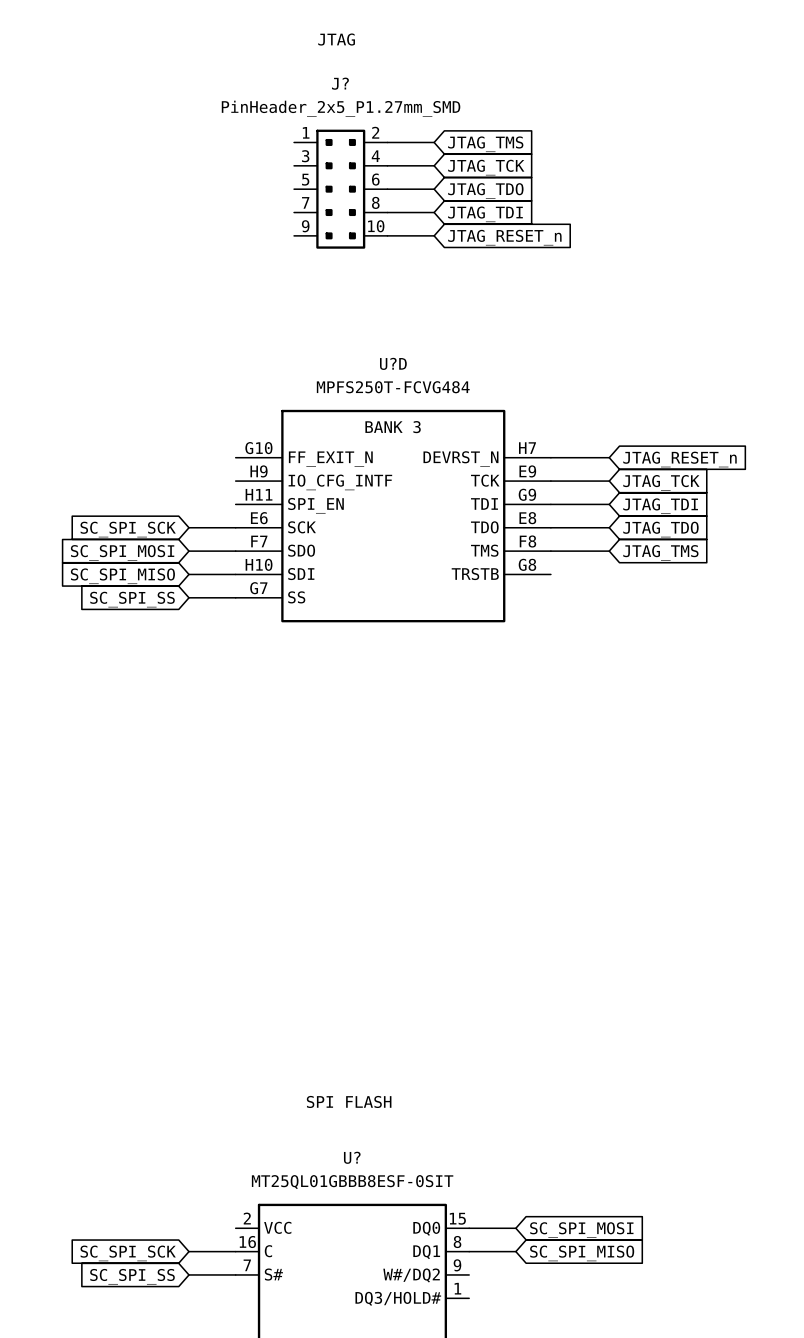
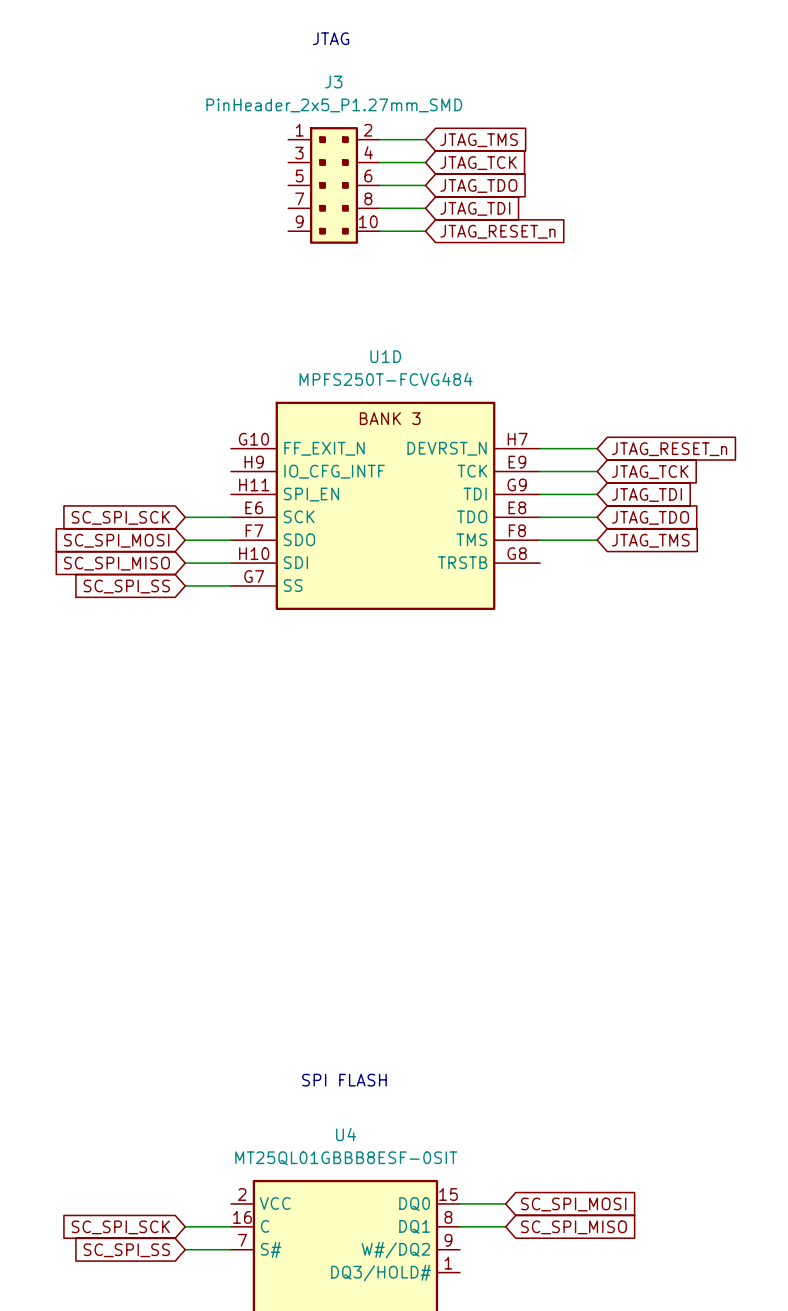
J? name: J? (340, 83) -> J3 (333, 82)
U?D name: U?D (393, 363) -> U1D (385, 356)
U? name: U? (352, 1157) -> U4 (346, 1134)

